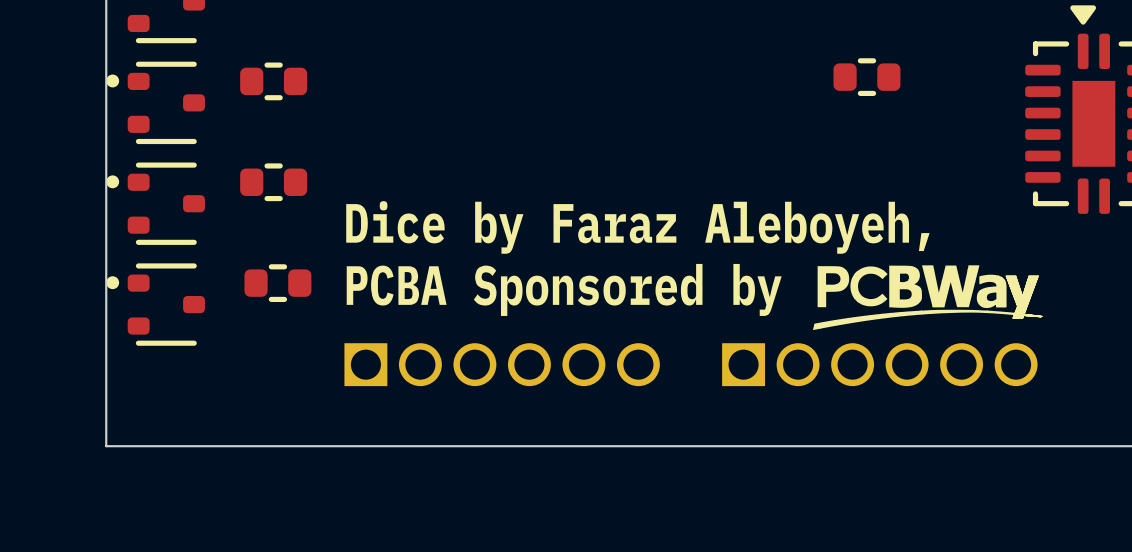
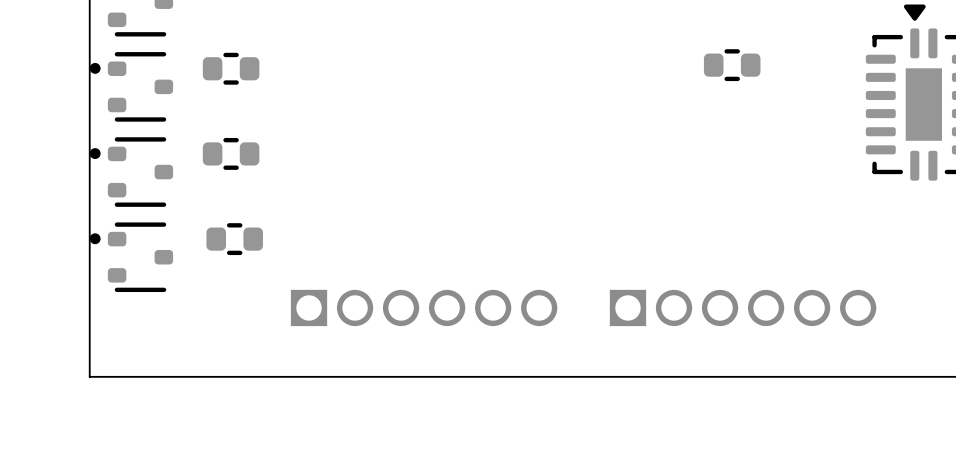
text: Dice by Faraz Aleboyeh, (637, 227) -> none
drawing: [813, 265, 1043, 331] -> none
text: PCBA Sponsored by (564, 289) -> none

